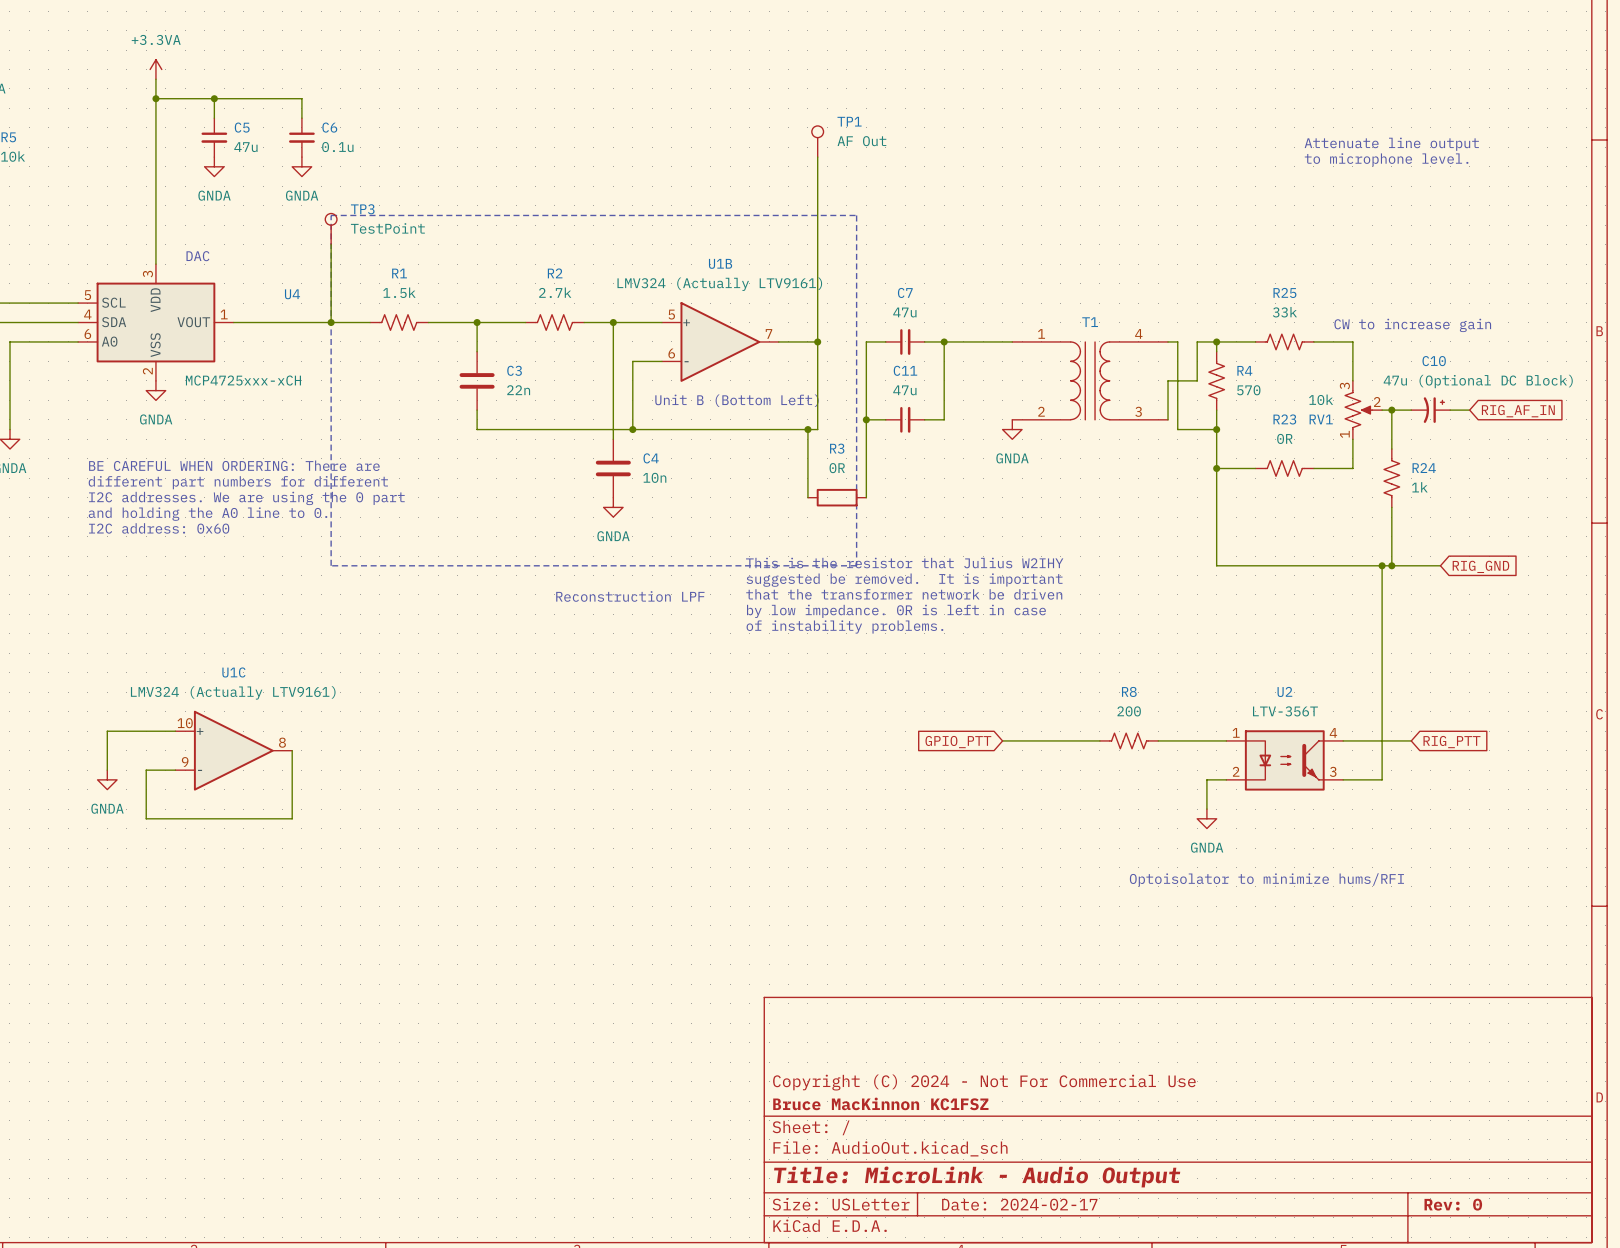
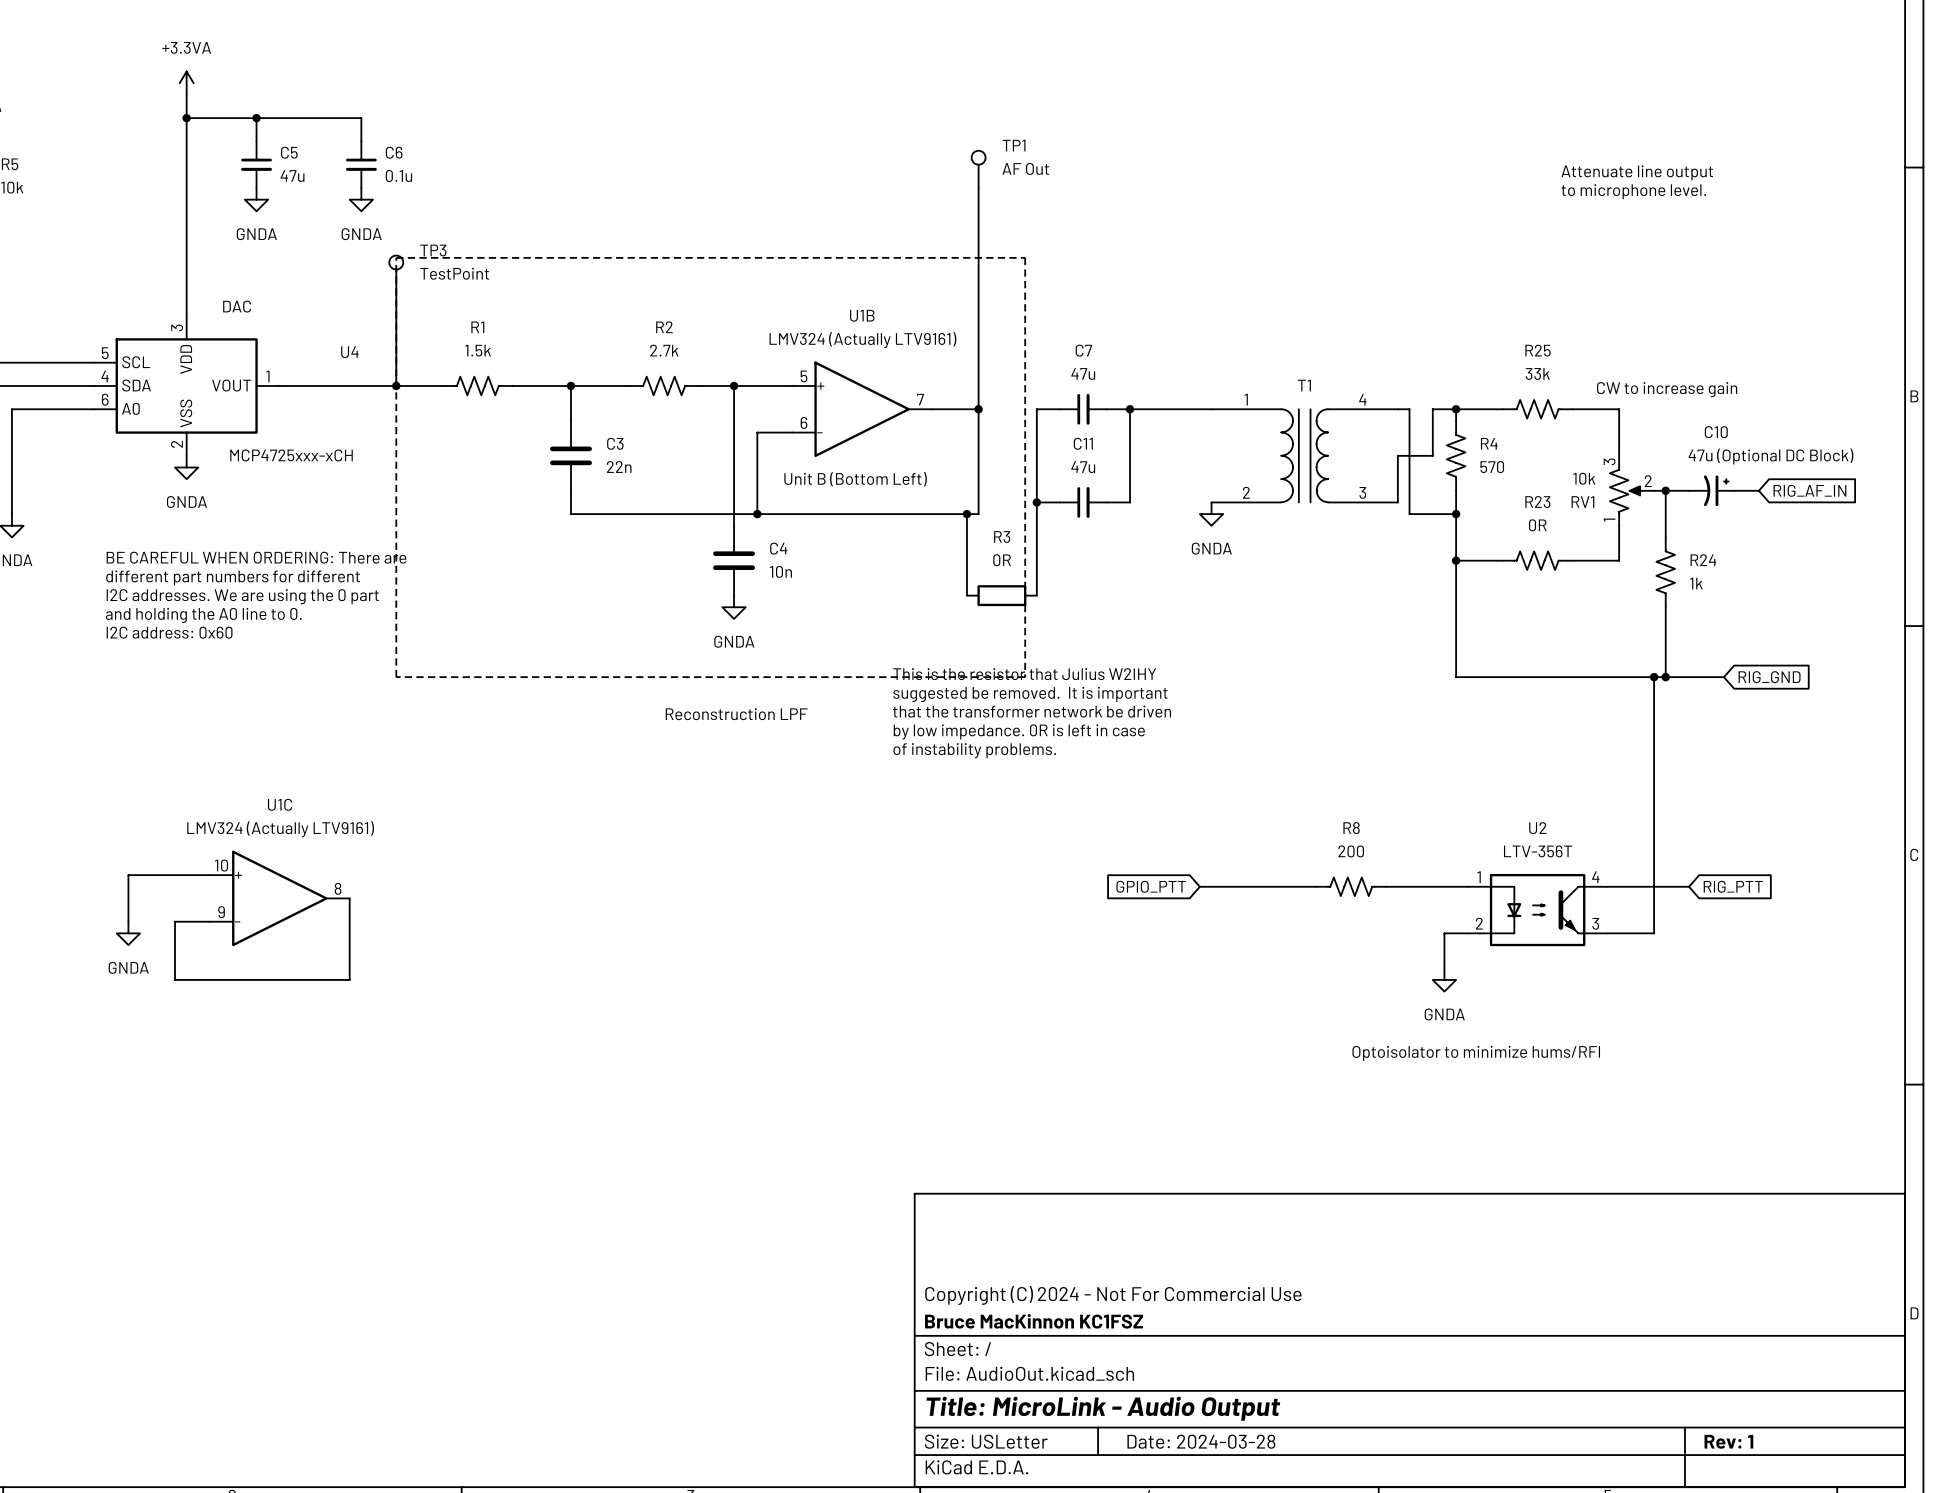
title block: Date: 2024-02-17 (1019, 1204) -> Date: 2024-03-28 (1201, 1441)
title block: Rev: 0 (1453, 1204) -> Rev: 1 (1728, 1441)

